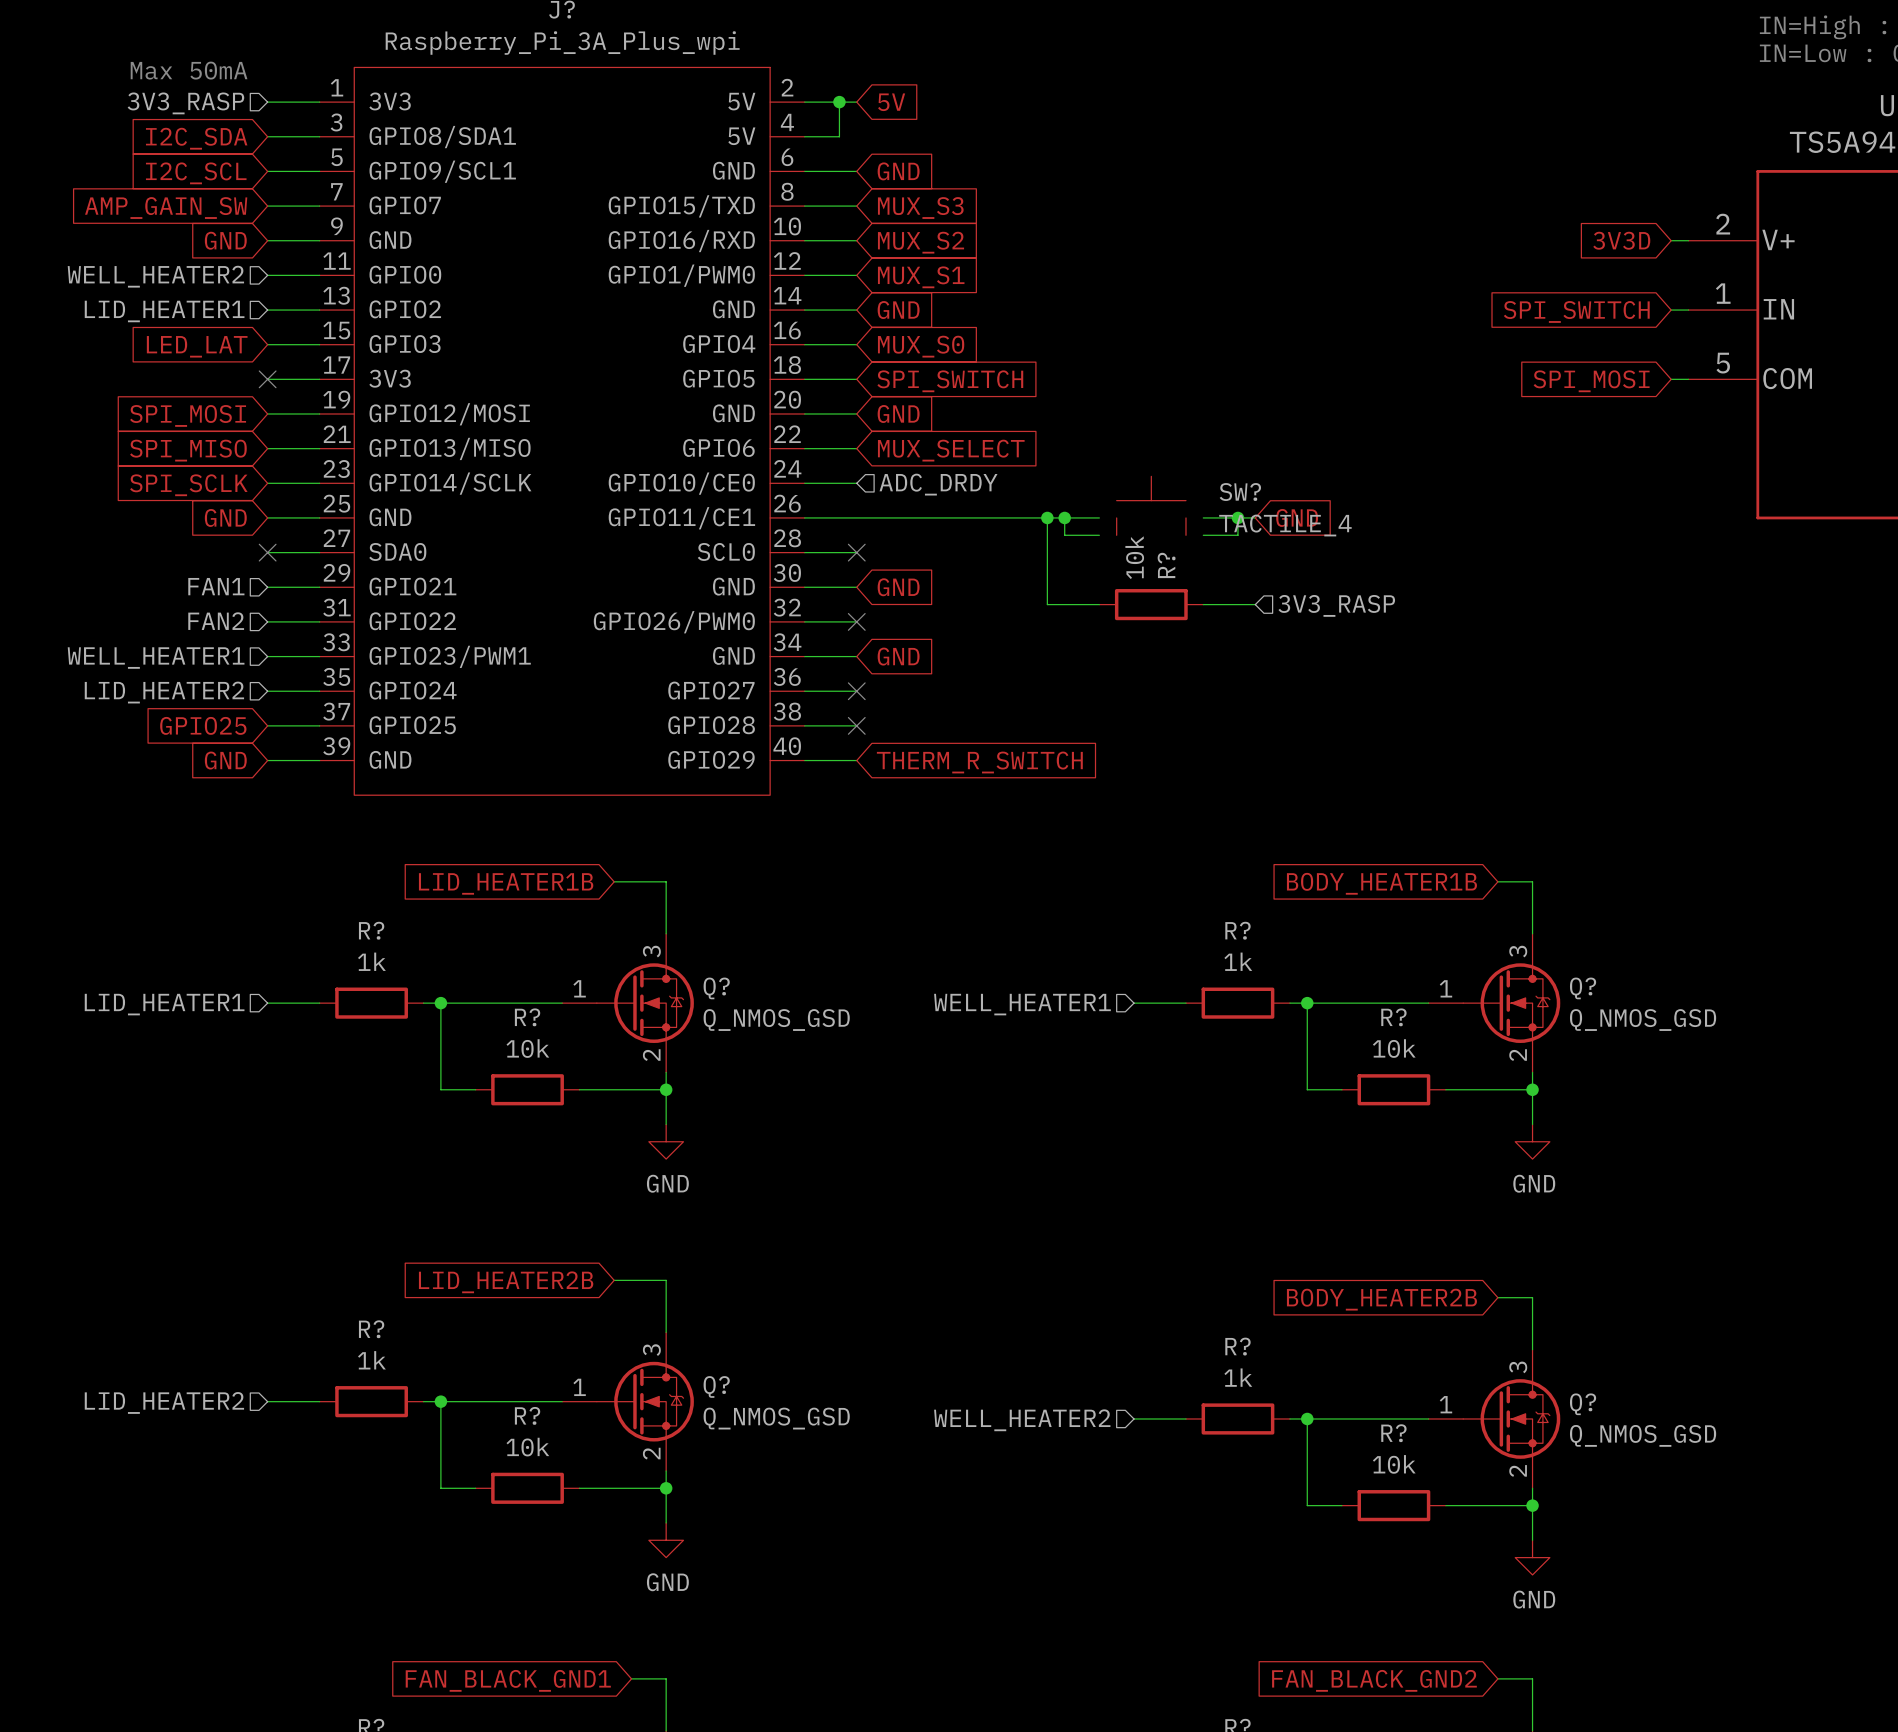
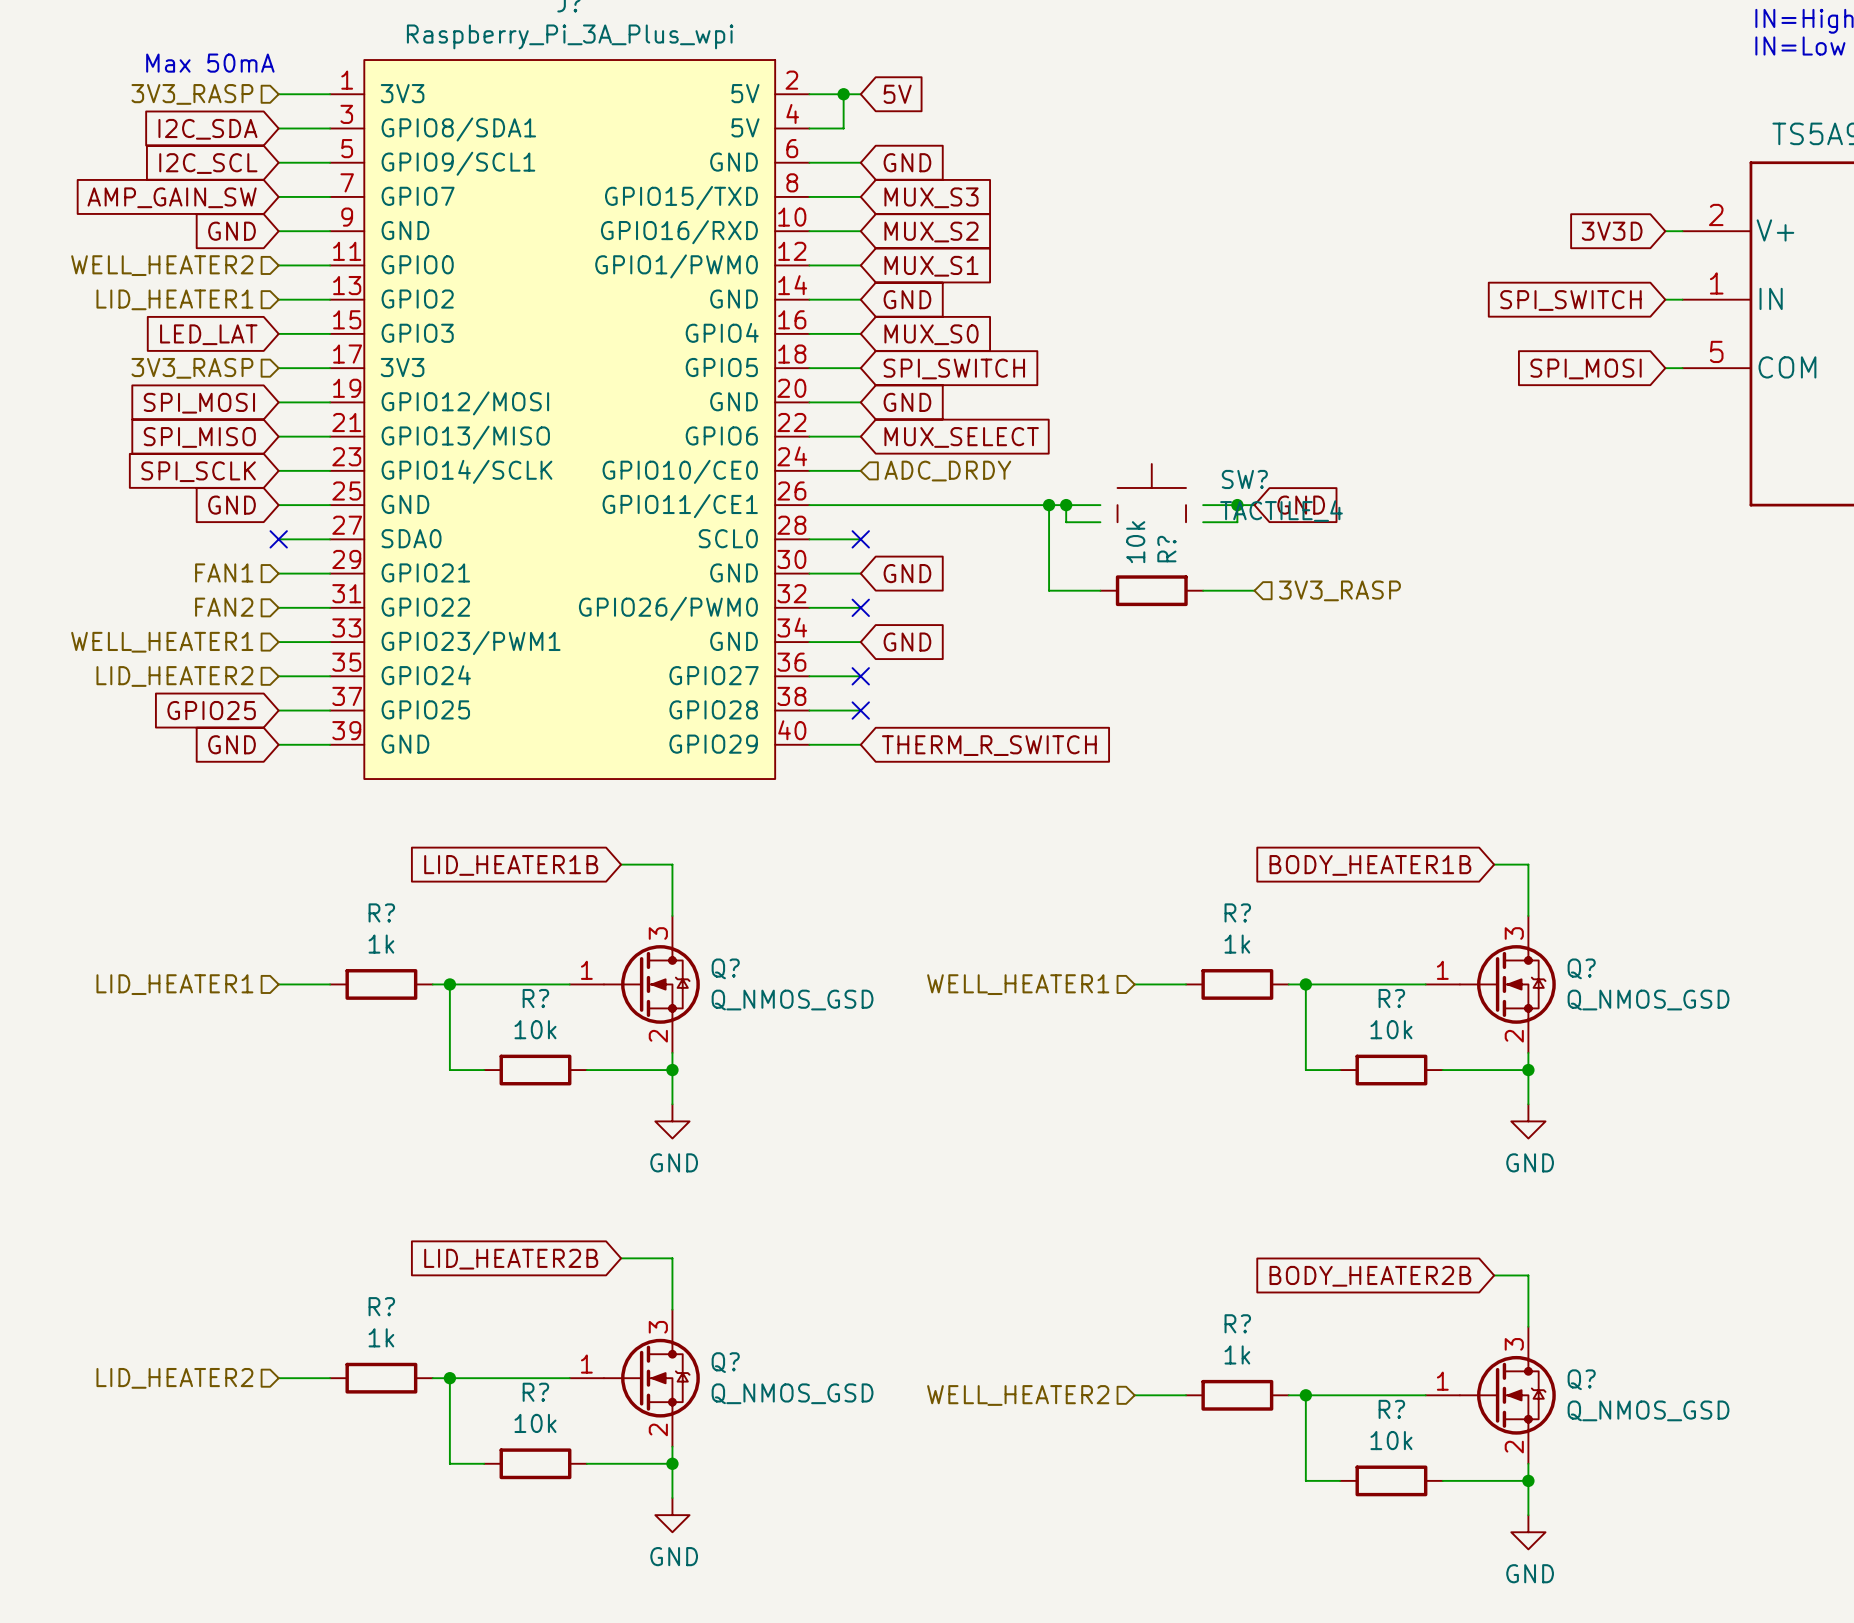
no-connect mark: (267, 379) -> none
hierarchical label: none -> 3V3_RASP (192, 368)

